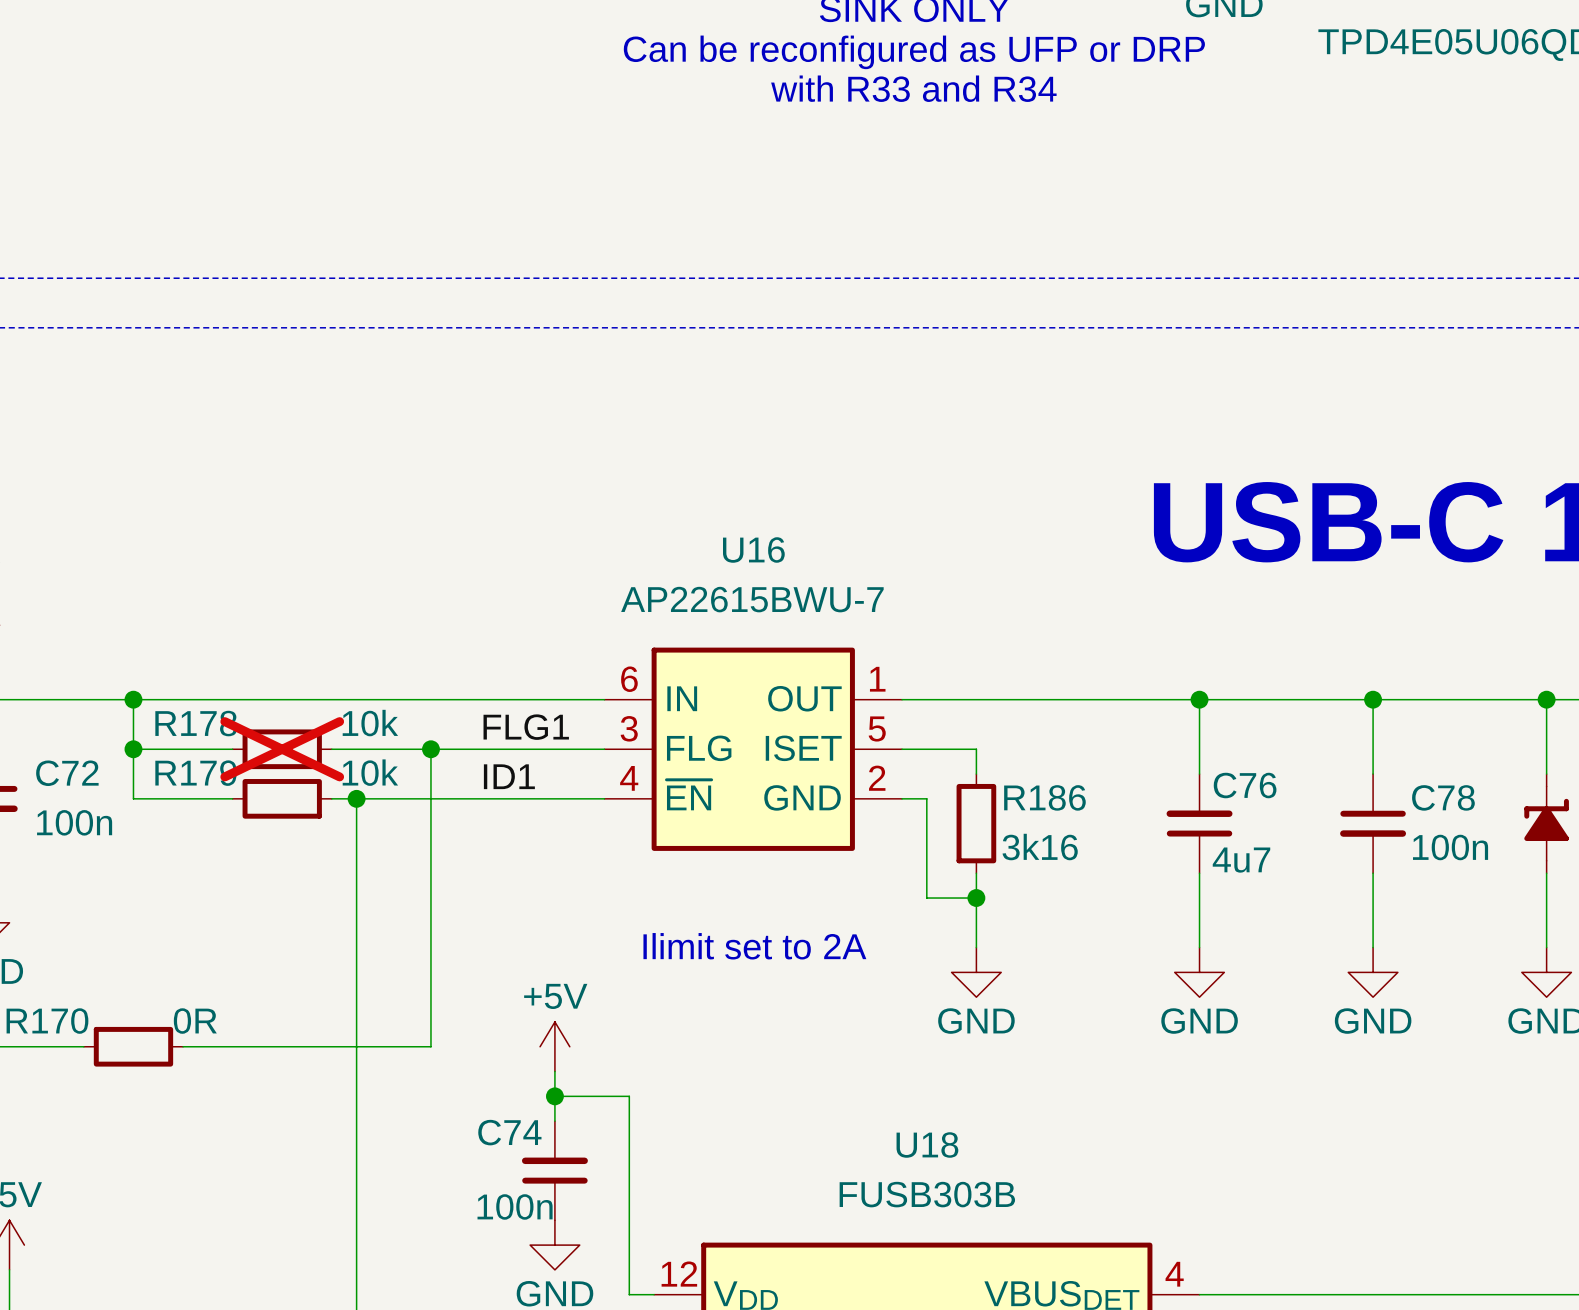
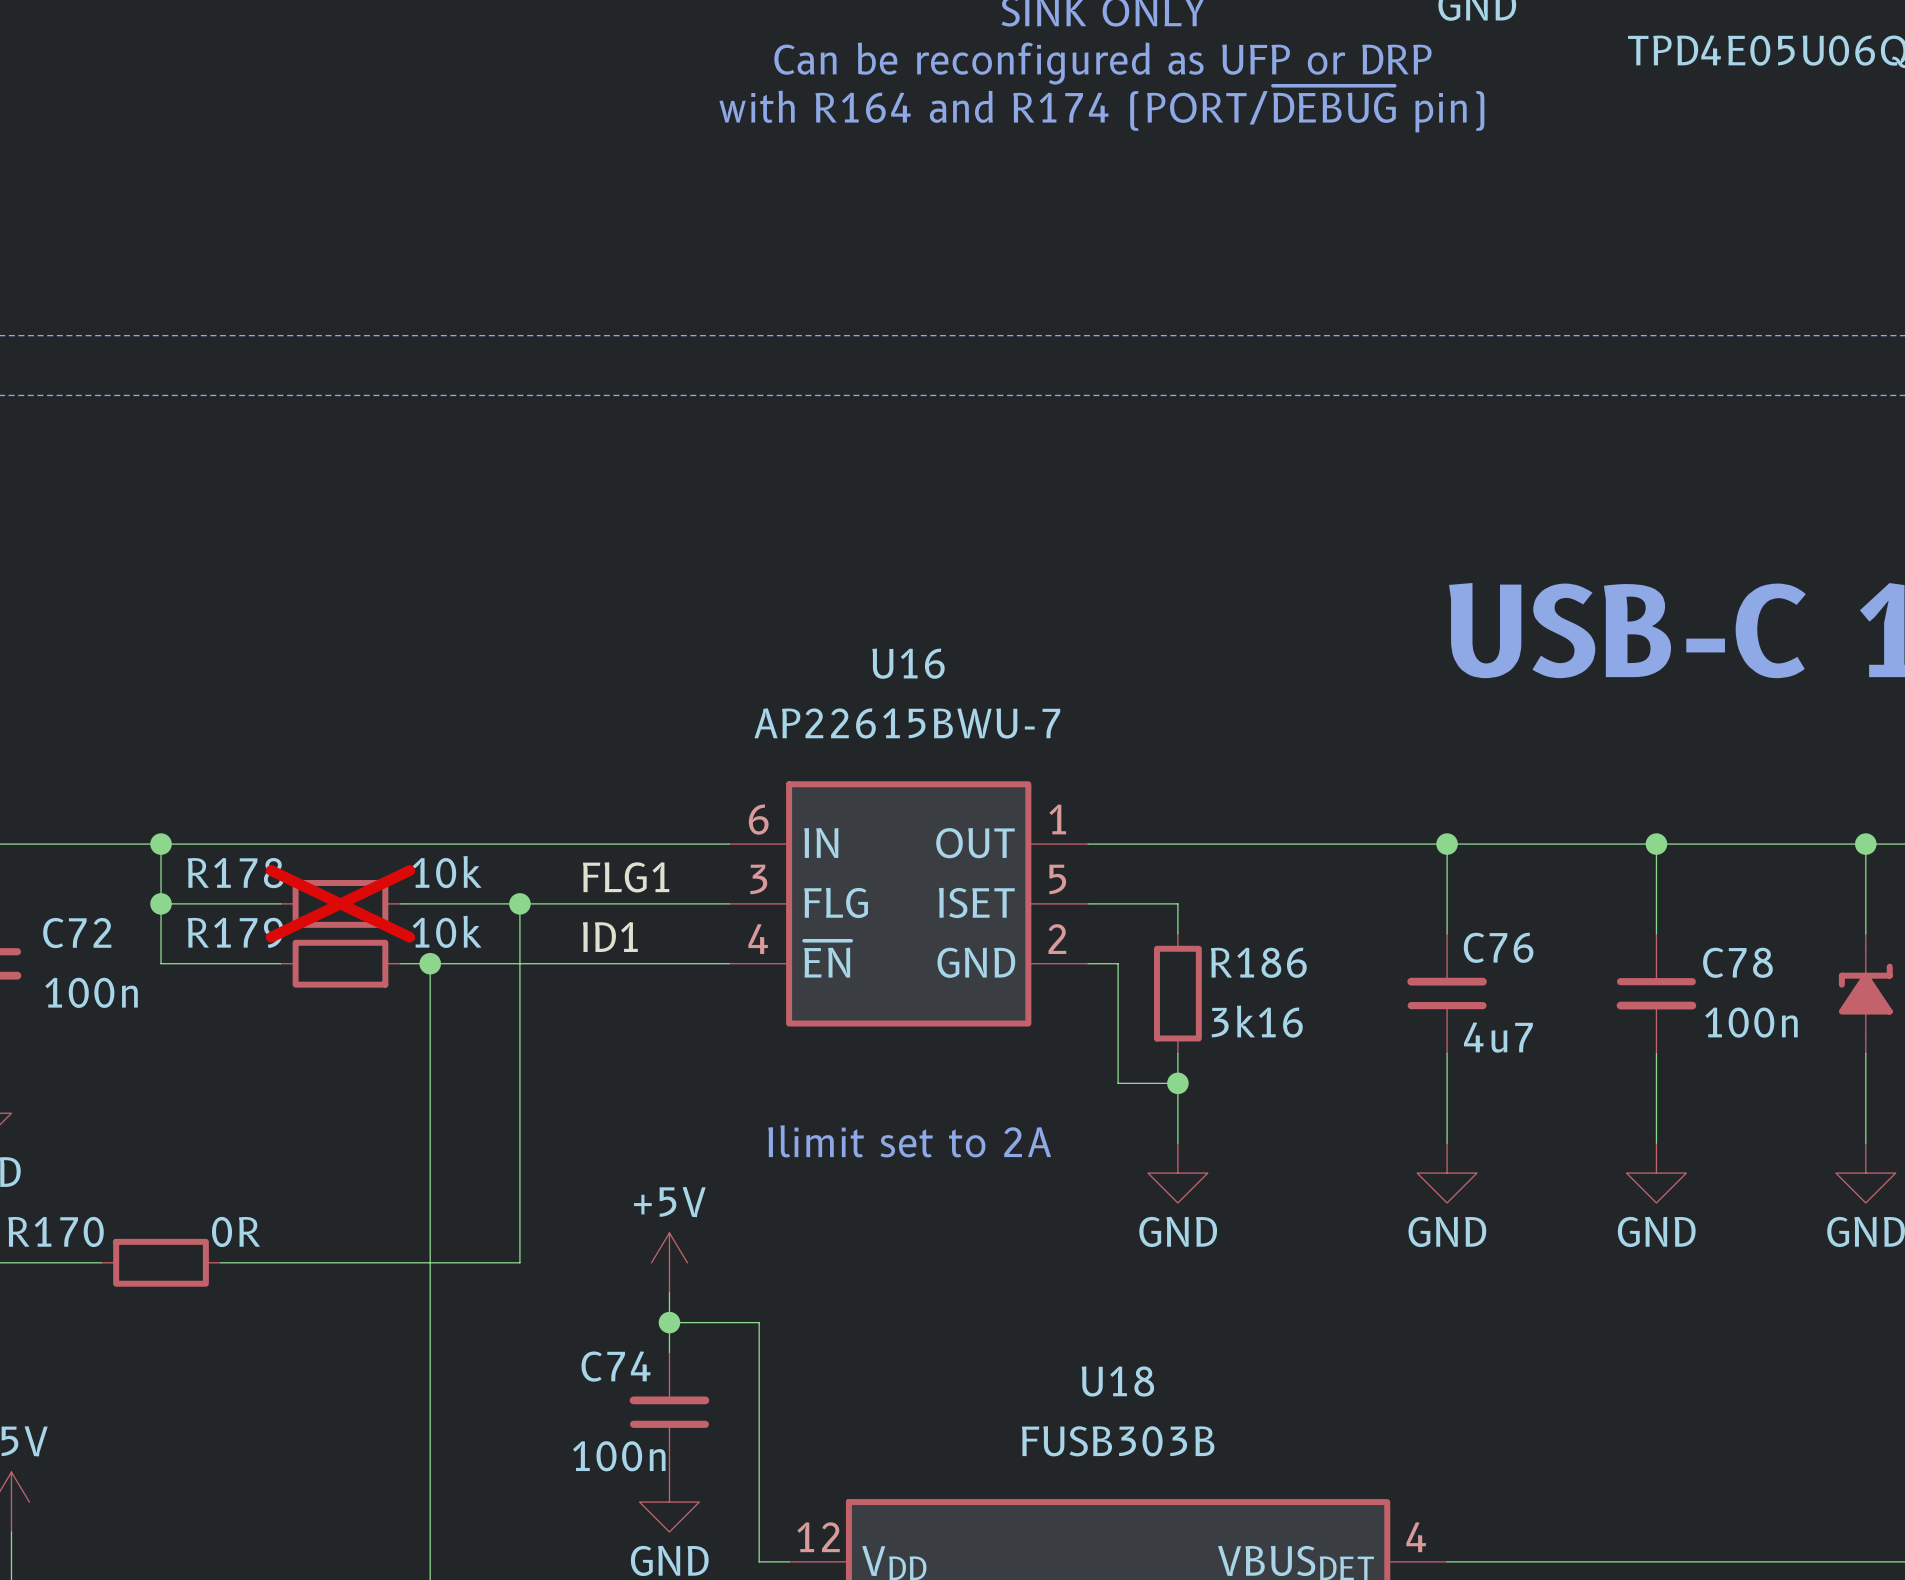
text: with R33 and R34 (913, 88) -> with R164 and R174 (PORT/~{DEBUG} pin) (1101, 109)

